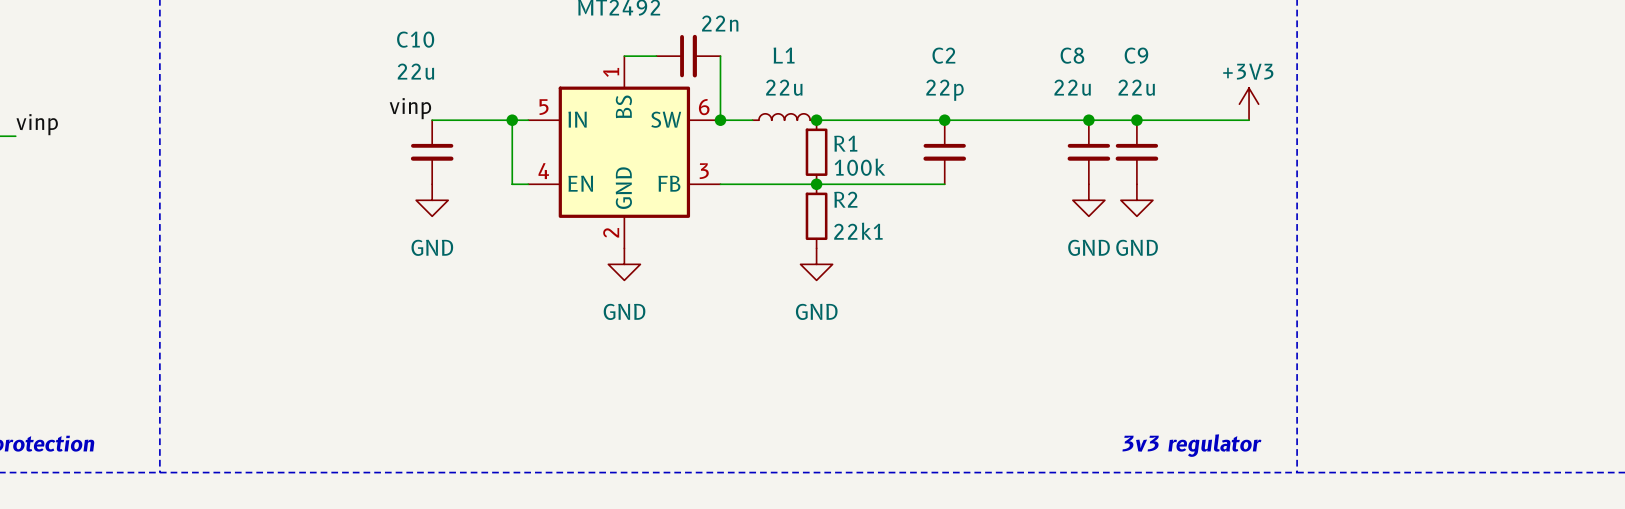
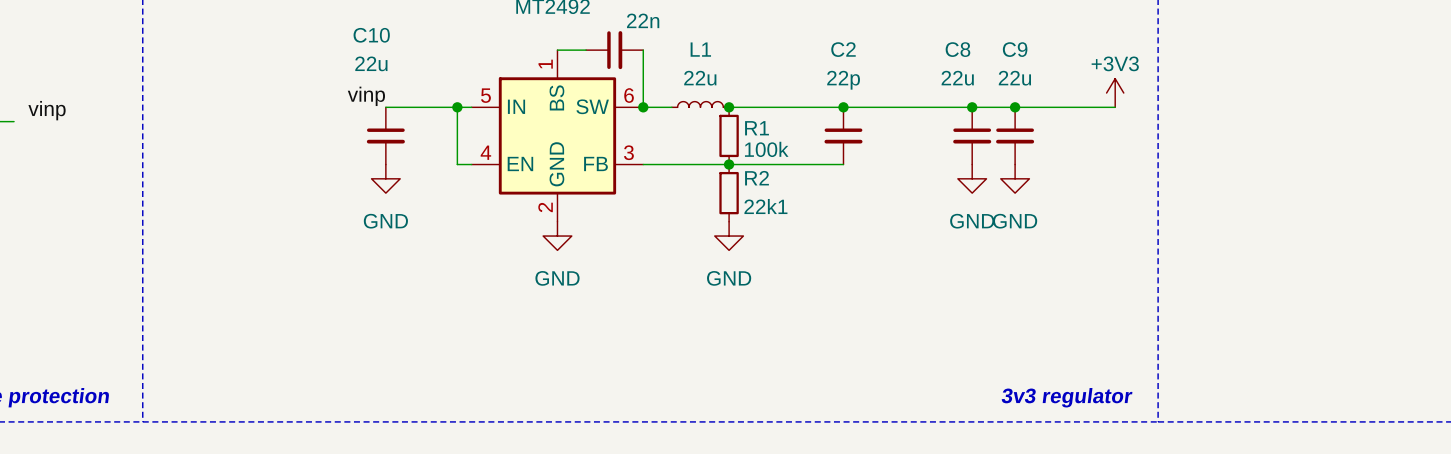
label position: vinp (37, 124) -> vinp (47, 110)

